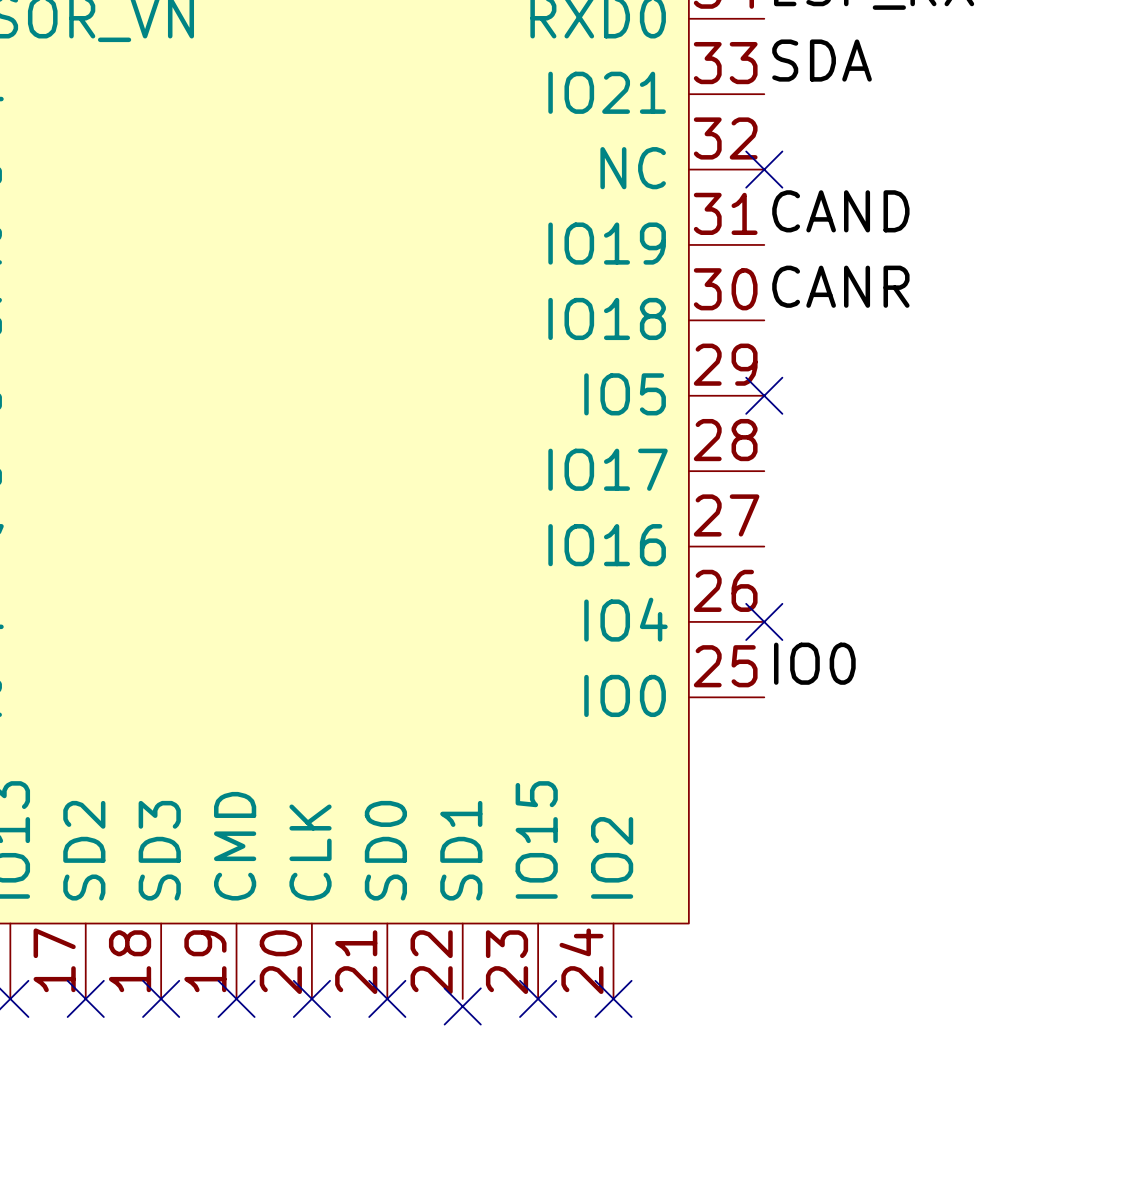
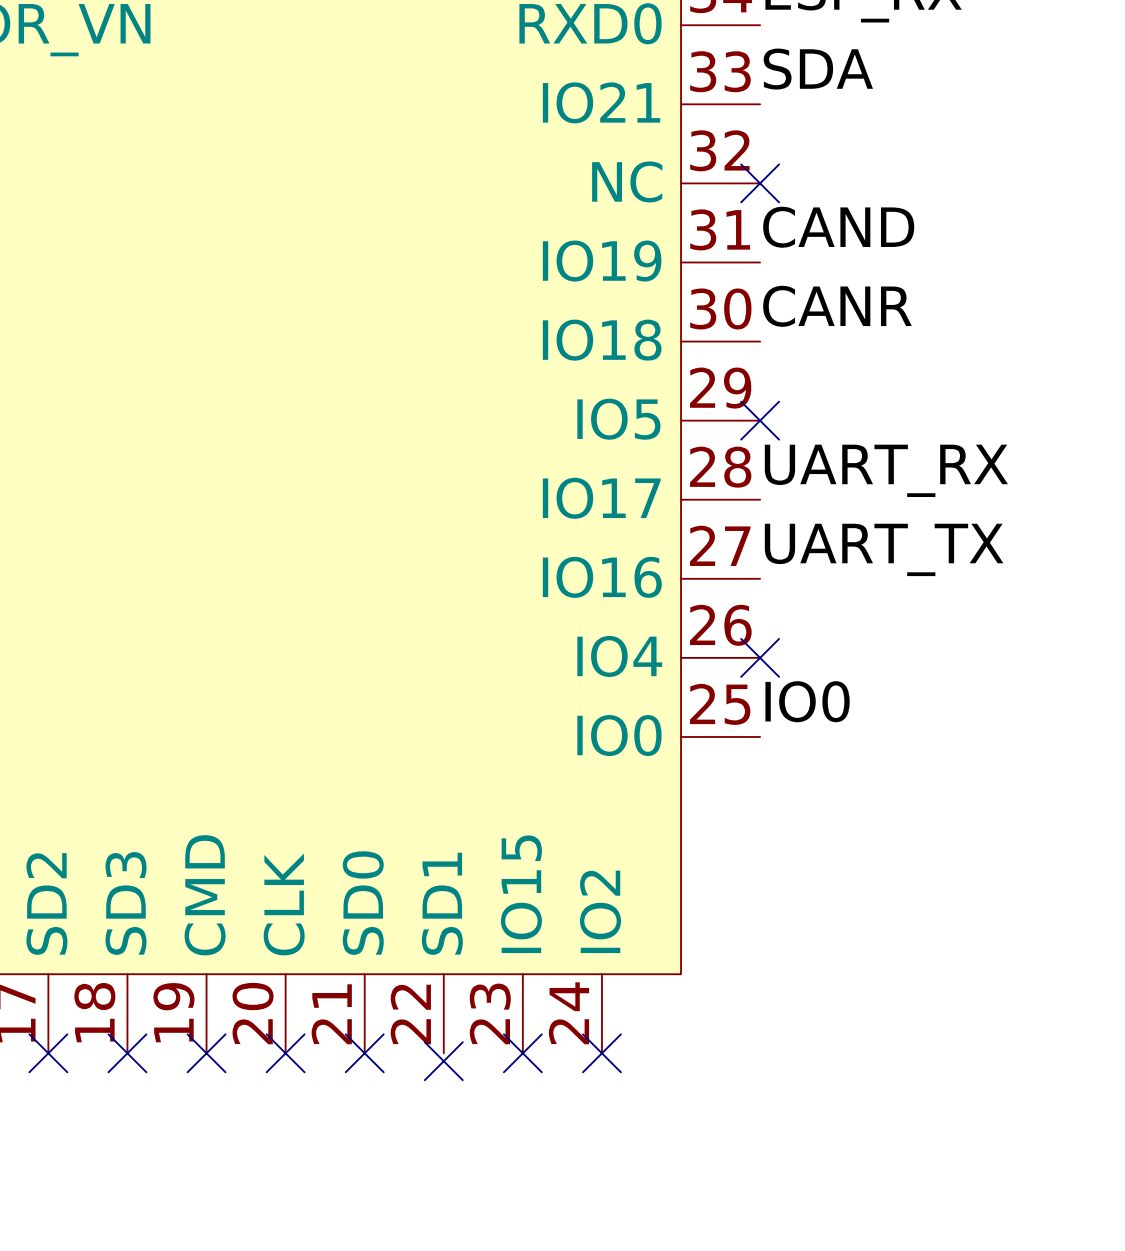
label: none -> UART_RX (886, 470)
label: none -> UART_TX (884, 549)

